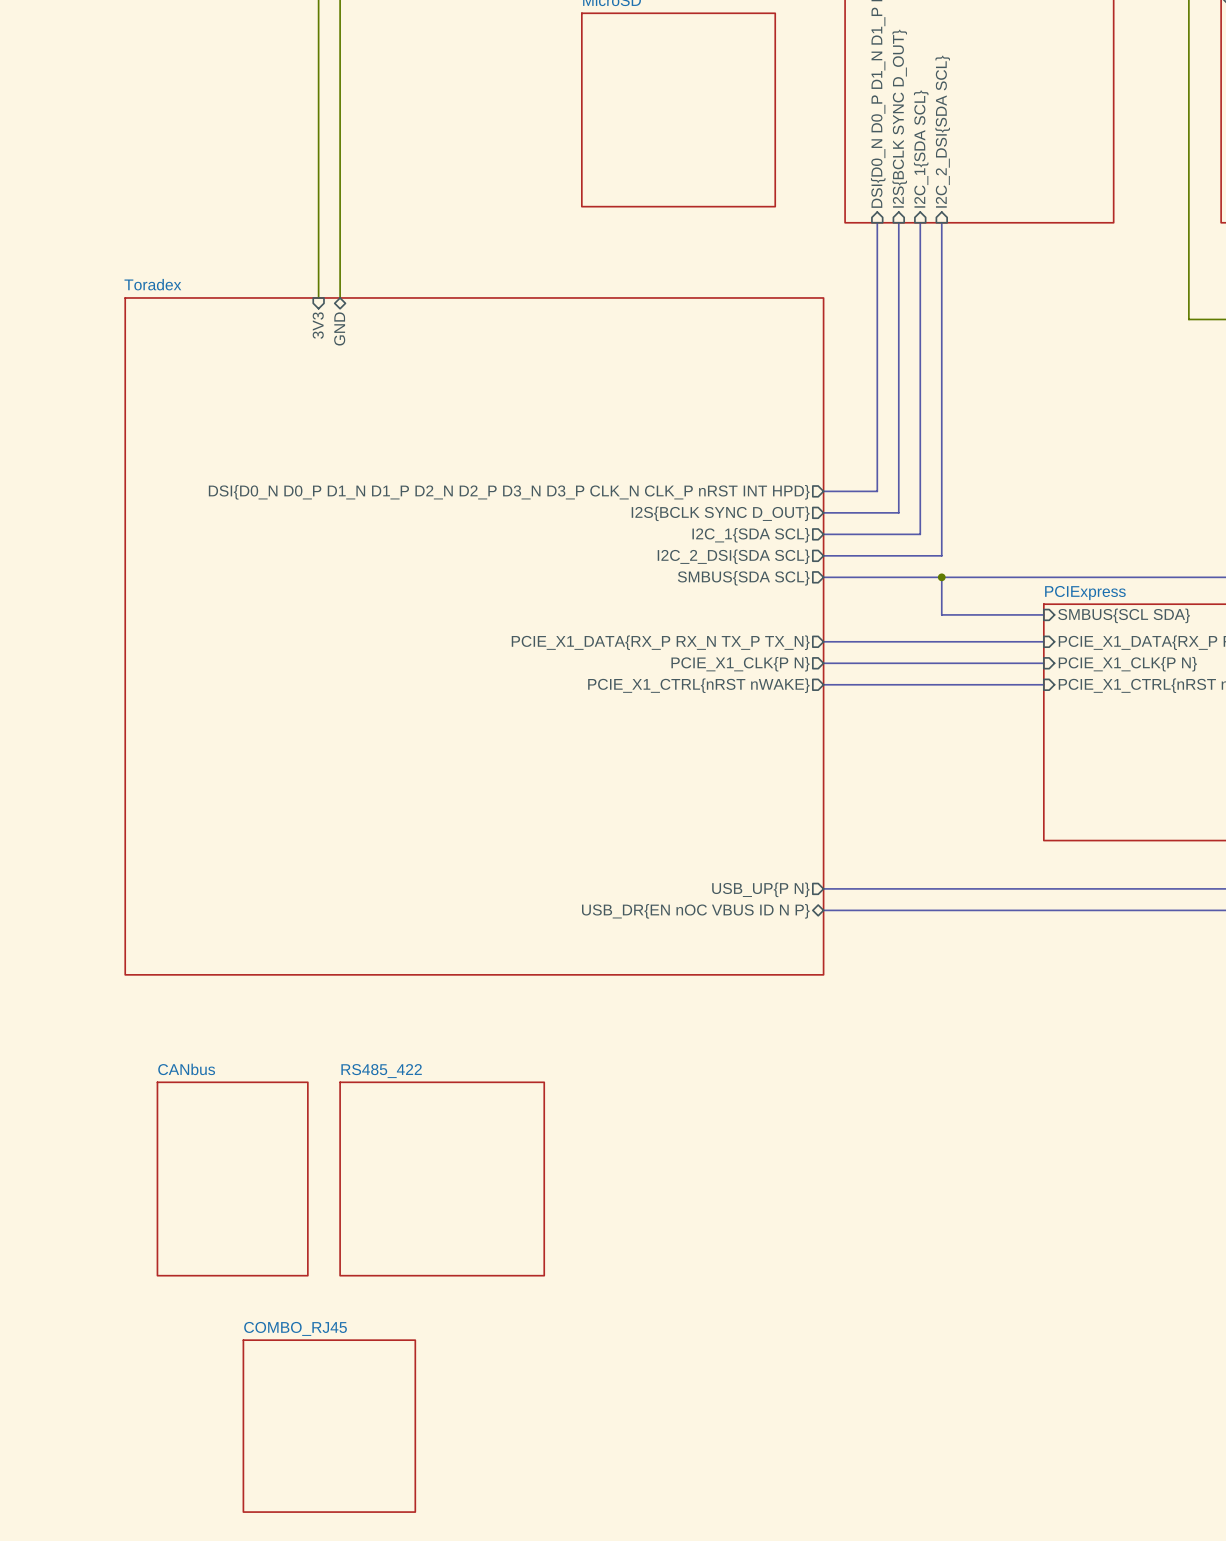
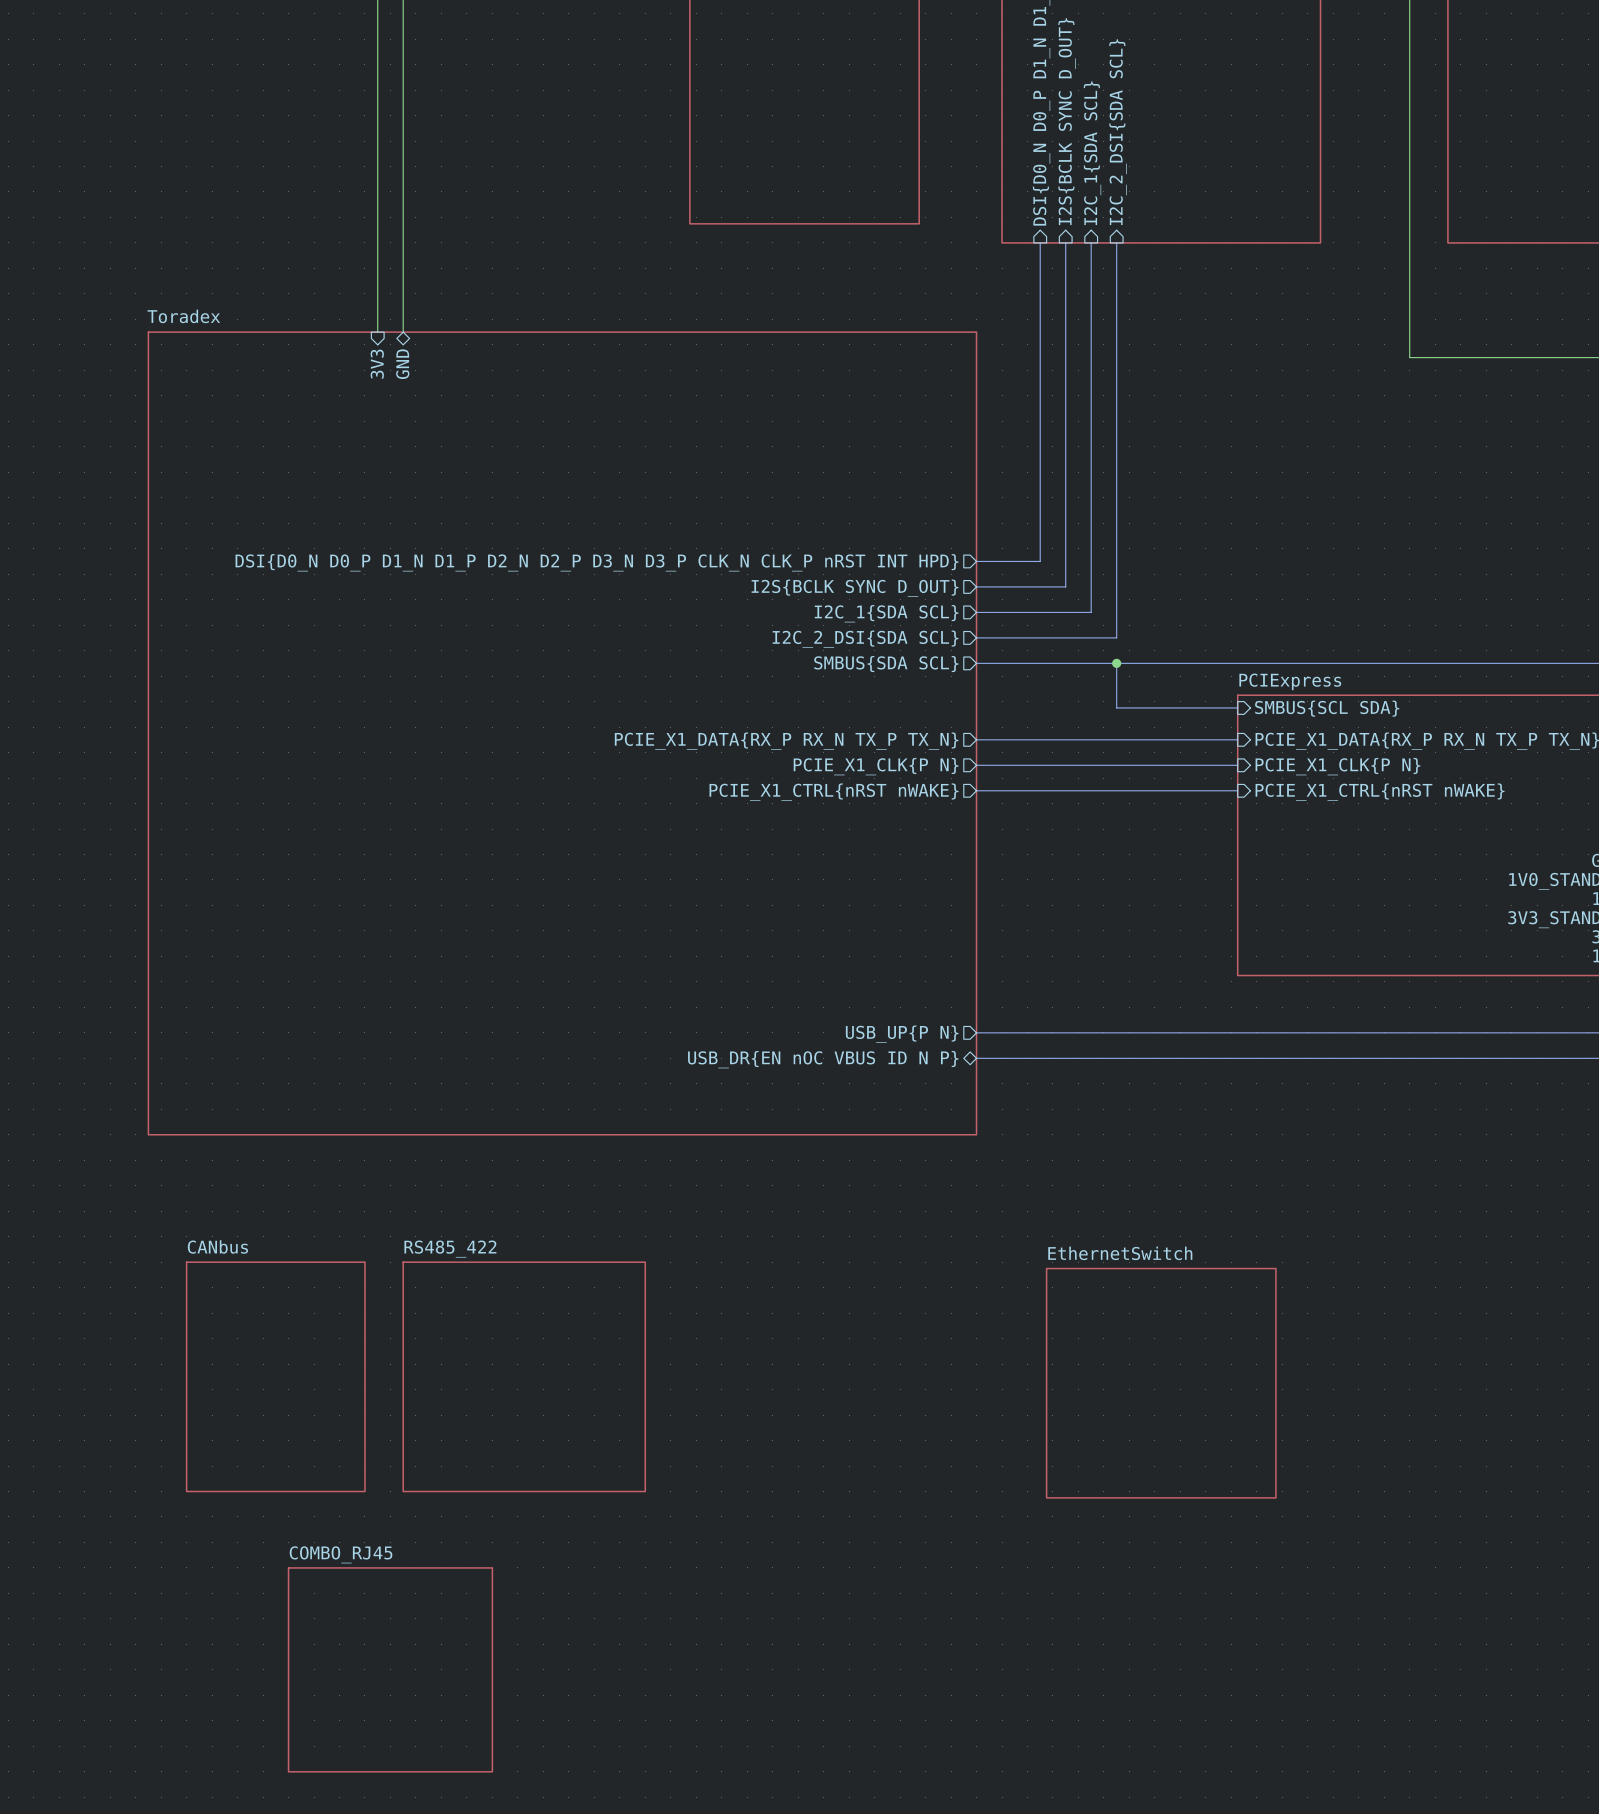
sheet EthernetSwitch: none -> (1161, 1383)

